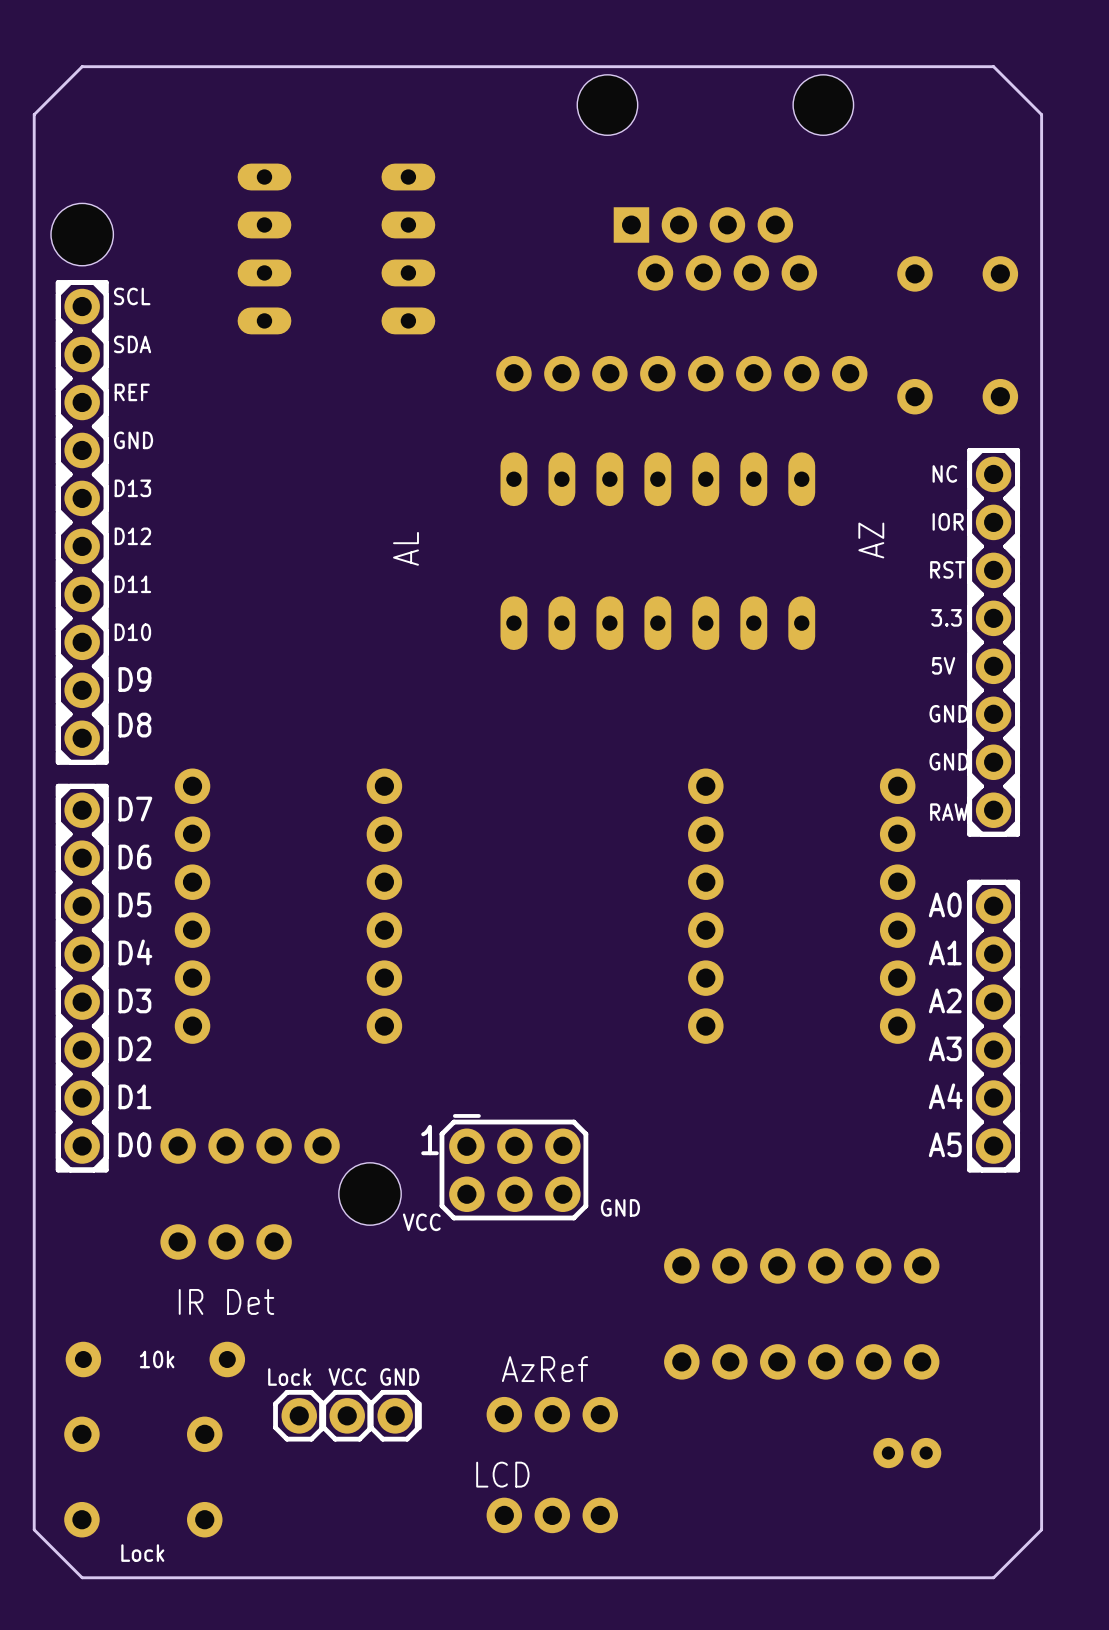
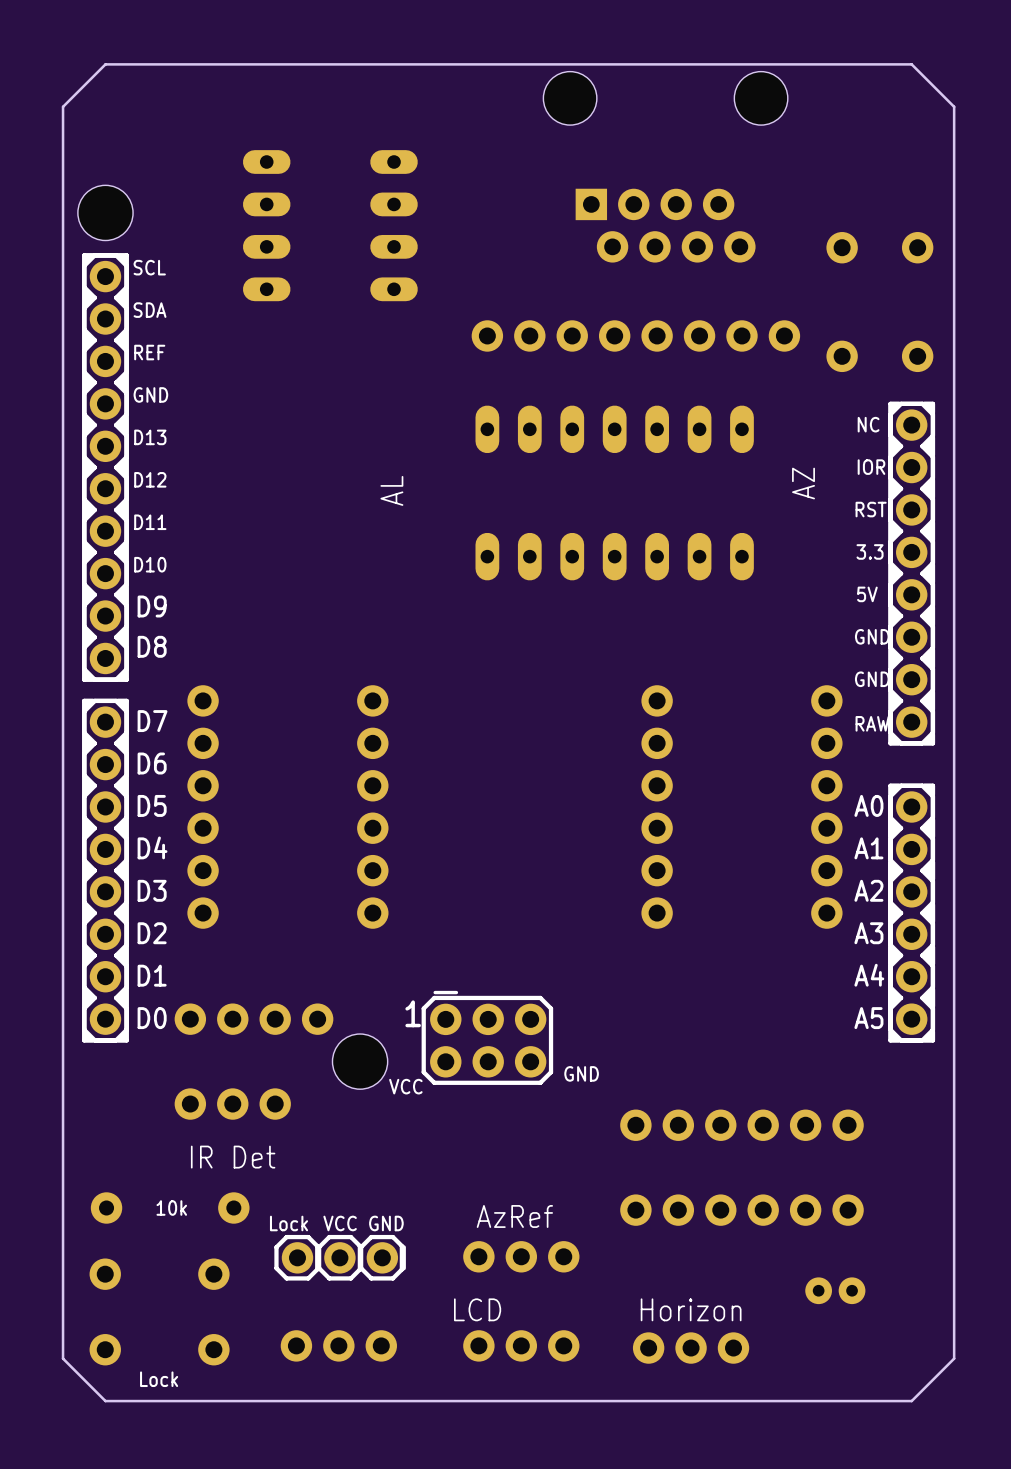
text: none -> Horizon (691, 1309)
part: none -> (338, 1345)
part: none -> (691, 1348)

